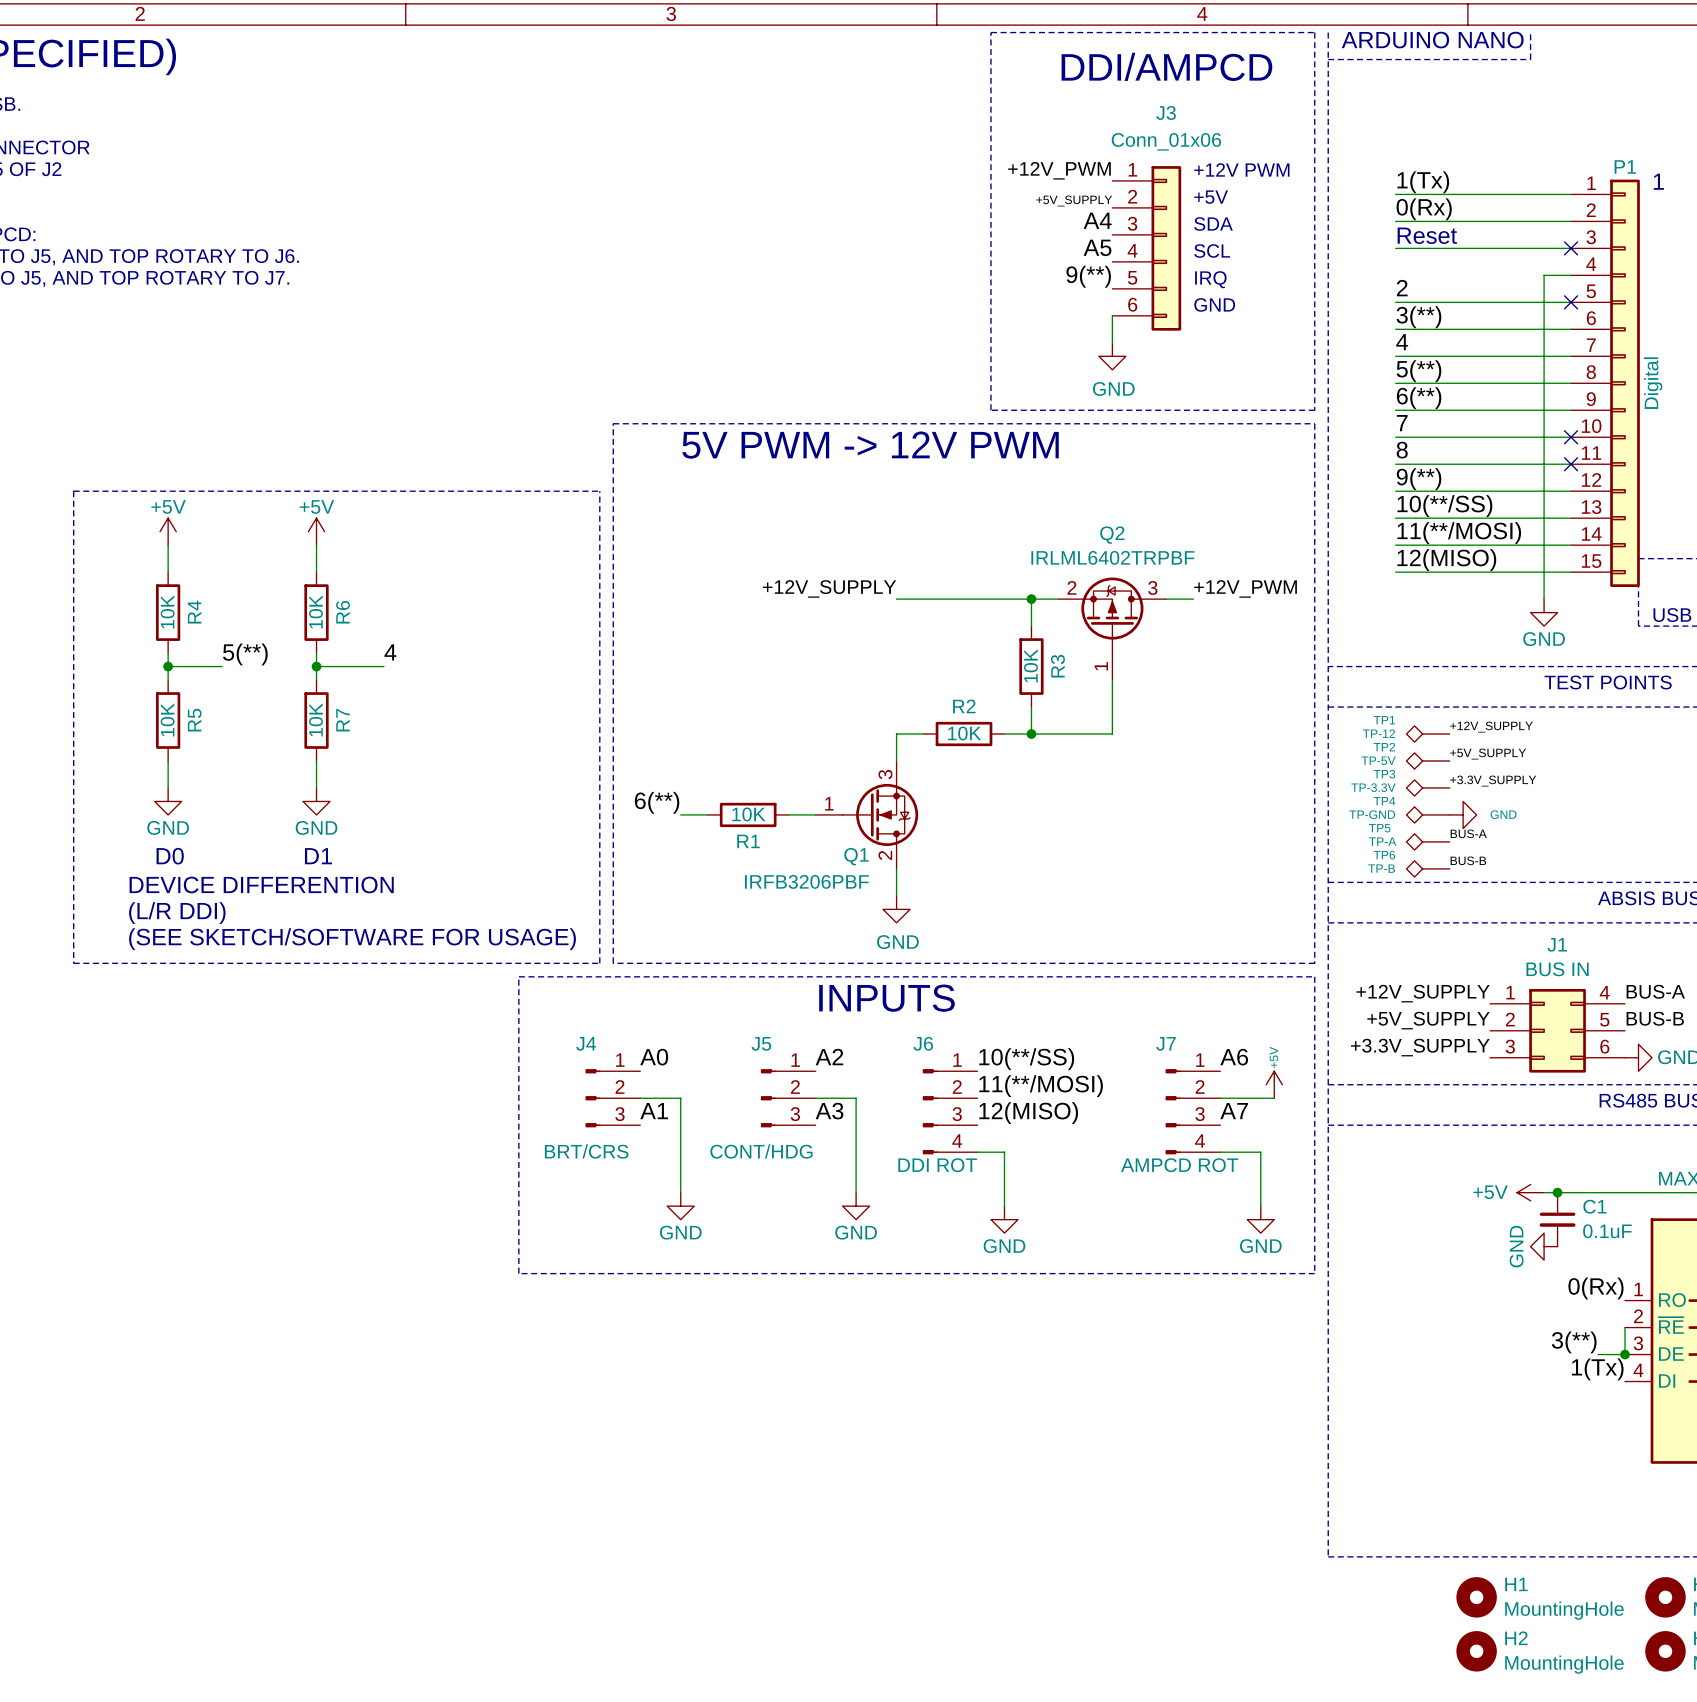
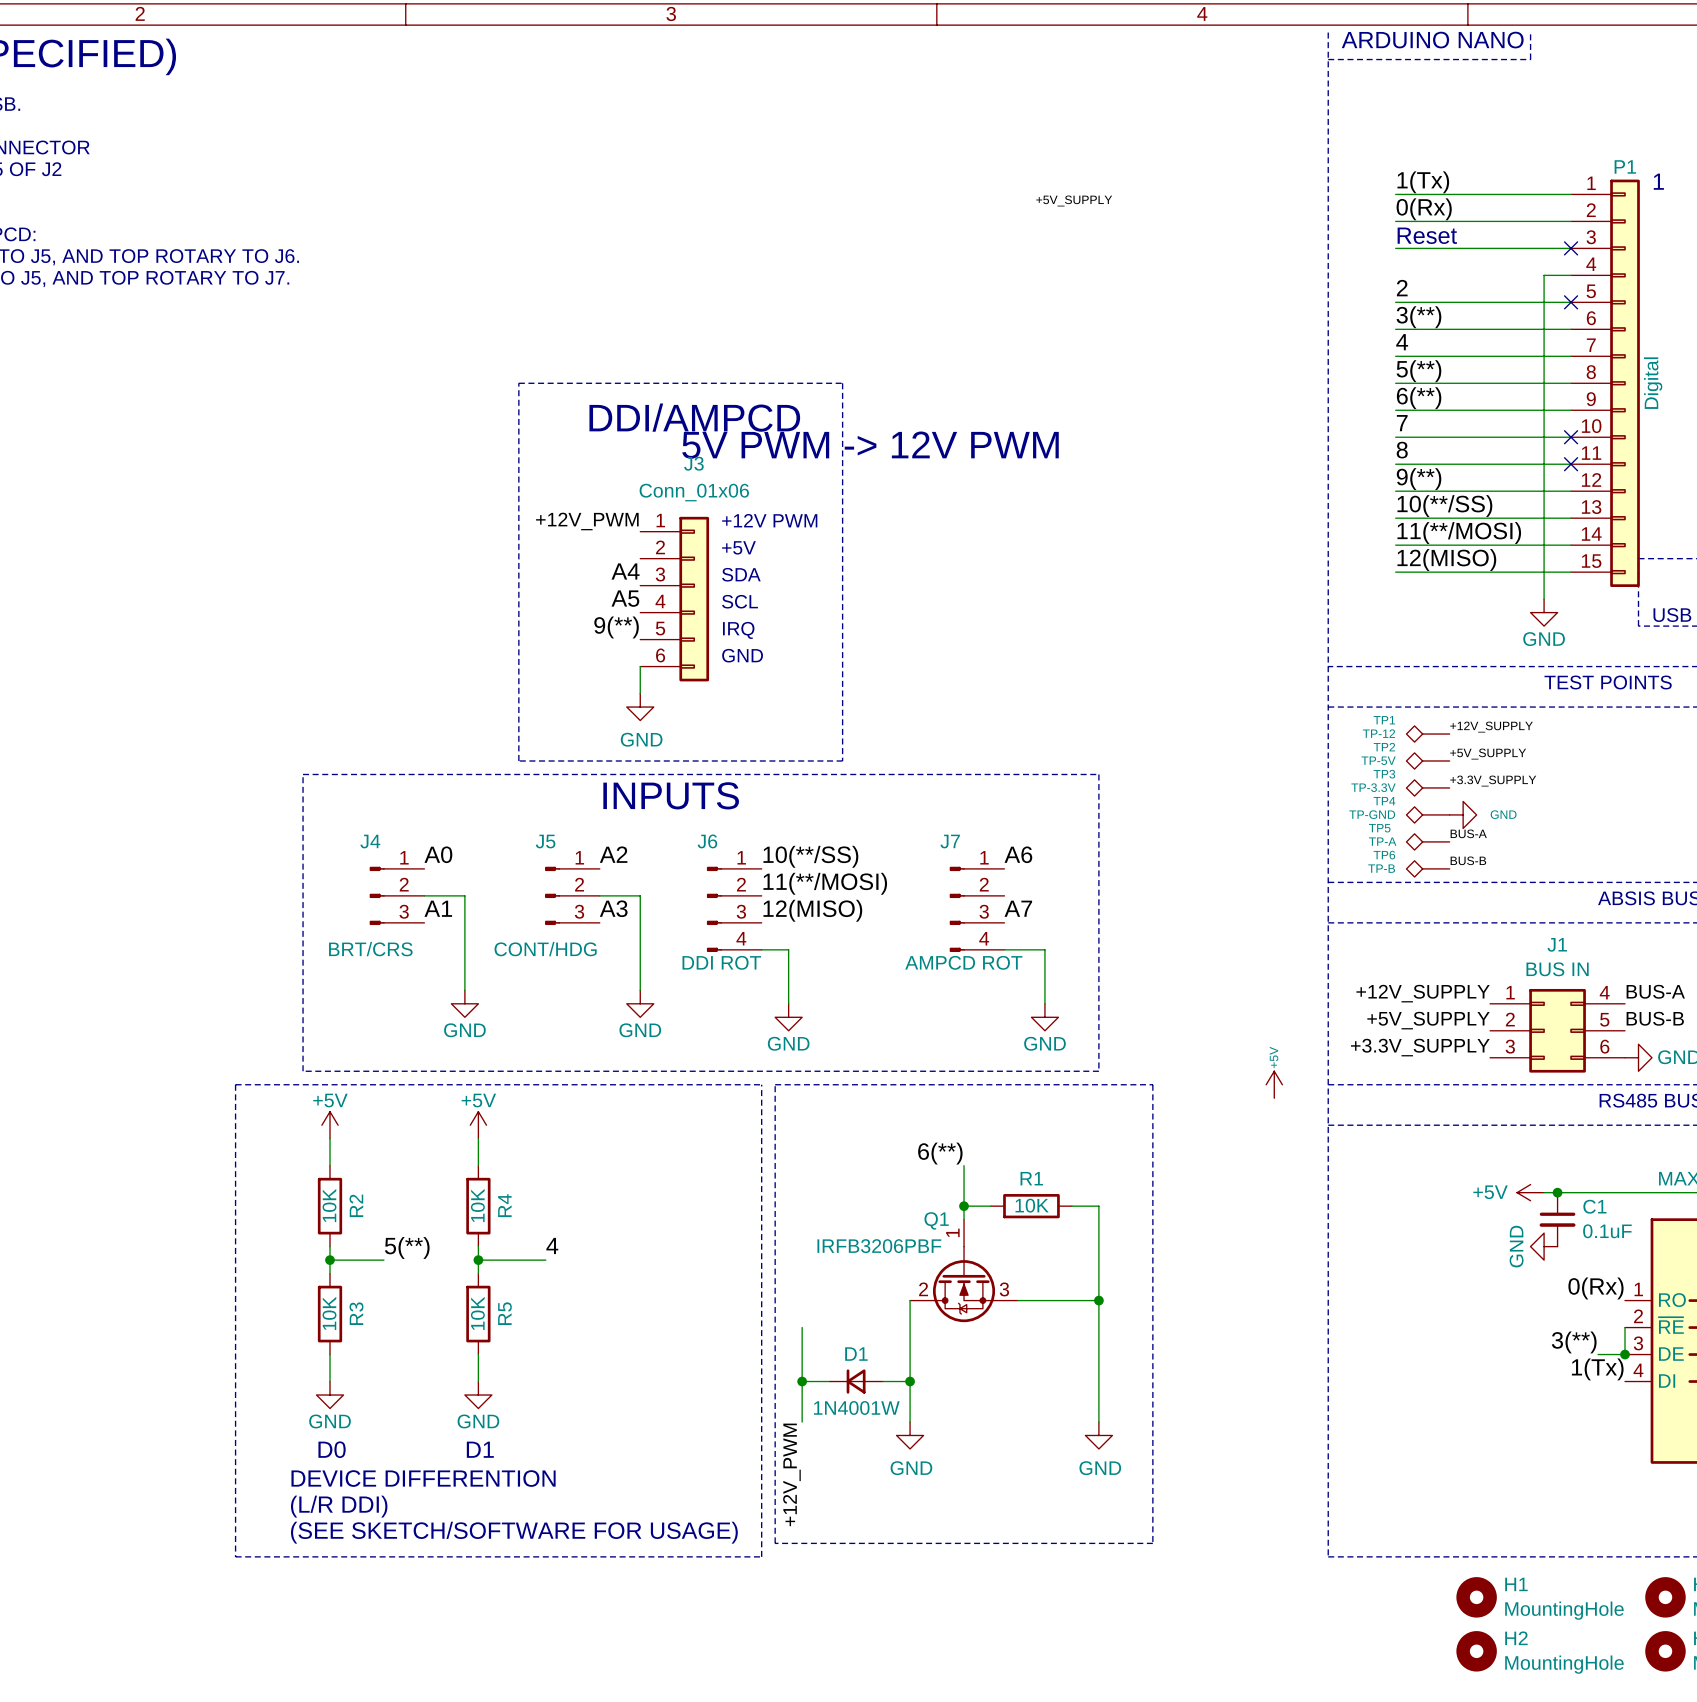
line: (990, 32) (1314, 32) (1314, 410) (990, 410) (990, 32) -> none
text: DDI/AMPCD (1166, 66) -> none
text: +12V PWM (1241, 169) -> none
label: +12V_PWM (1059, 170) -> none
text: +5V (1211, 197) -> none
label: A4 (1097, 220) -> none
text: SDA (1213, 224) -> none
label: A5 (1097, 247) -> none
J3 position: (1146, 248) -> (674, 599)
text: SCL (1212, 250) -> none
label: 9(**) (1088, 276) -> none
text: IRQ (1210, 279) -> none
text: GND (1214, 304) -> none
wire: (1112, 315) (1112, 342) -> none
power symbol: GND (1112, 356) -> none
line: none -> (518, 383) (842, 383) (842, 760) (518, 760) (518, 383)
text: none -> DDI/AMPCD (694, 417)
line: (613, 423) (1314, 423) (1314, 963) (613, 963) (613, 423) -> none
line: (73, 491) (599, 491) (599, 963) (73, 963) (73, 491) -> none
text: none -> +12V PWM (769, 520)
label: none -> +12V_PWM (587, 521)
power symbol: +5V (168, 531) -> none
power symbol: +5V (316, 531) -> none
wire: (168, 545) (168, 572) -> none
wire: (316, 545) (316, 572) -> none
text: none -> +5V (738, 547)
label: none -> A4 (625, 571)
text: none -> SDA (741, 574)
label: +12V_SUPPLY (829, 588) -> none
label: +12V_PWM (1245, 588) -> none
label: none -> A5 (625, 598)
wire: (896, 599) (1058, 599) -> none
wire: (1031, 599) (1031, 626) -> none
junction: (1031, 599) -> none
wire: (1166, 599) (1193, 599) -> none
text: none -> SCL (740, 601)
R4 position: (168, 612) -> (478, 1206)
R6: 10K (316, 612) -> none
label: none -> 9(**) (616, 627)
Q2: IRLML6402TRPBF (1112, 628) -> none
text: none -> IRQ (738, 630)
label: 4 (390, 652) -> none
wire: (168, 653) (168, 680) -> none
wire: (316, 653) (316, 680) -> none
label: 5(**) (245, 654) -> none
text: none -> GND (742, 655)
wire: (168, 666) (222, 666) -> none
junction: (168, 666) -> none
wire: (316, 666) (383, 666) -> none
junction: (316, 666) -> none
wire: none -> (640, 666) (640, 693)
R3 position: (1031, 666) -> (330, 1314)
wire: (1112, 680) (1112, 734) (1004, 734) -> none
power symbol: none -> GND (640, 707)
wire: (1031, 707) (1031, 734) -> none
R5 position: (168, 720) -> (478, 1314)
R7: 10K (316, 720) -> none
wire: (923, 734) (896, 734) (896, 760) -> none
R2 rotation: 0° (964, 734) -> 90° clockwise (330, 1206)
R2 position: (964, 734) -> (330, 1206)
junction: (1031, 734) -> none
wire: (168, 760) (168, 787) -> none
wire: (316, 760) (316, 787) -> none
line: none -> (303, 774) (1098, 774) (1098, 1071) (303, 1071) (303, 774)
text: none -> INPUTS (671, 795)
power symbol: GND (168, 801) -> none
power symbol: GND (316, 801) -> none
label: 6(**) (657, 802) -> none
wire: (680, 814) (707, 814) -> none
R1 position: (748, 814) -> (1031, 1206)
wire: (788, 814) (815, 814) -> none
Q1 position: (866, 814) -> (964, 1270)
Q1 rotation: 0° (880, 814) -> 90° clockwise (964, 1284)
R1 name position: R1 (748, 841) -> R1 (1031, 1178)
label: none -> A0 (438, 854)
label: none -> A2 (613, 854)
label: none -> A6 (1018, 854)
text: D0 (170, 856) -> none
text: D1 (318, 856) -> none
label: none -> 10(**/SS) (810, 856)
Q1 name position: Q1 (856, 856) -> Q1 (936, 1220)
wire: (896, 868) (896, 895) -> none
Q1 value position: IRFB3206PBF (806, 881) -> IRFB3206PBF (879, 1246)
label: none -> 11(**/MOSI) (825, 883)
text: DEVICE DIFFERENTION (261, 884) -> none
wire: none -> (424, 895) (464, 895) (464, 990)
label: none -> A1 (438, 908)
label: none -> A3 (613, 908)
label: none -> A7 (1018, 908)
power symbol: GND (896, 909) -> none
label: none -> 12(MISO) (812, 910)
text: (L/R DDI) (177, 913) -> none
text: (SEE SKETCH/SOFTWARE FOR USAGE) (352, 939) -> none
wire: none -> (761, 949) (788, 949) (788, 1003)
wire: none -> (1004, 949) (1044, 949) (1044, 1003)
line: (518, 976) (1314, 976) (1314, 1273) (518, 1273) (518, 976) -> none
text: INPUTS (886, 998) -> none
power symbol: none -> GND (464, 1003)
power symbol: none -> GND (640, 1003)
power symbol: none -> GND (788, 1017)
power symbol: none -> GND (1044, 1017)
label: A0 (654, 1057) -> none
label: A2 (829, 1057) -> none
label: A6 (1234, 1057) -> none
label: 10(**/SS) (1026, 1059) -> none
line: none -> (235, 1084) (761, 1084) (761, 1556) (235, 1556) (235, 1084)
line: none -> (775, 1084) (1152, 1084) (1152, 1543) (775, 1543) (775, 1084)
label: 11(**/MOSI) (1041, 1086) -> none
J4 position: (612, 1098) -> (397, 895)
wire: (640, 1098) (680, 1098) (680, 1192) -> (599, 895) (640, 895) (640, 990)
J5 position: (788, 1098) -> (572, 895)
wire: (815, 1098) (856, 1098) (856, 1192) -> none
wire: (1220, 1098) (1274, 1098) -> none
label: A1 (654, 1111) -> none
label: A3 (829, 1111) -> none
J6 position: (950, 1111) -> (734, 909)
J7 position: (1192, 1111) -> (977, 909)
label: A7 (1234, 1111) -> none
label: 12(MISO) (1028, 1113) -> none
power symbol: none -> +5V (330, 1125)
power symbol: none -> +5V (478, 1125)
wire: none -> (330, 1138) (330, 1165)
wire: none -> (478, 1138) (478, 1165)
wire: (977, 1152) (1004, 1152) (1004, 1206) -> none
wire: (1220, 1152) (1260, 1152) (1260, 1206) -> none
label: none -> 6(**) (940, 1153)
wire: none -> (964, 1165) (964, 1219)
power symbol: GND (680, 1206) -> none
power symbol: GND (856, 1206) -> none
wire: none -> (964, 1206) (990, 1206)
junction: none -> (964, 1206)
wire: none -> (1071, 1206) (1098, 1206) (1098, 1421)
power symbol: GND (1004, 1219) -> none
power symbol: GND (1260, 1219) -> none
label: none -> 4 (552, 1245)
wire: none -> (330, 1246) (330, 1273)
wire: none -> (478, 1246) (478, 1273)
label: none -> 5(**) (407, 1247)
wire: none -> (330, 1260) (383, 1260)
junction: none -> (330, 1260)
wire: none -> (478, 1260) (545, 1260)
junction: none -> (478, 1260)
wire: none -> (910, 1300) (910, 1421)
wire: none -> (1017, 1300) (1098, 1300)
junction: none -> (1098, 1300)
wire: none -> (802, 1327) (802, 1421)
wire: none -> (330, 1354) (330, 1381)
wire: none -> (478, 1354) (478, 1381)
wire: none -> (802, 1381) (829, 1381)
junction: none -> (802, 1381)
D1: none -> 1N4001W (856, 1381)
wire: none -> (883, 1381) (910, 1381)
junction: none -> (910, 1381)
power symbol: none -> GND (330, 1395)
power symbol: none -> GND (478, 1395)
power symbol: none -> GND (910, 1435)
power symbol: none -> GND (1098, 1435)
text: none -> D0 (332, 1449)
text: none -> D1 (480, 1449)
label: none -> +12V_PWM (791, 1474)
text: none -> DEVICE DIFFERENTION (423, 1478)
text: none -> (L/R DDI) (339, 1506)
text: none -> (SEE SKETCH/SOFTWARE FOR USAGE) (514, 1532)

